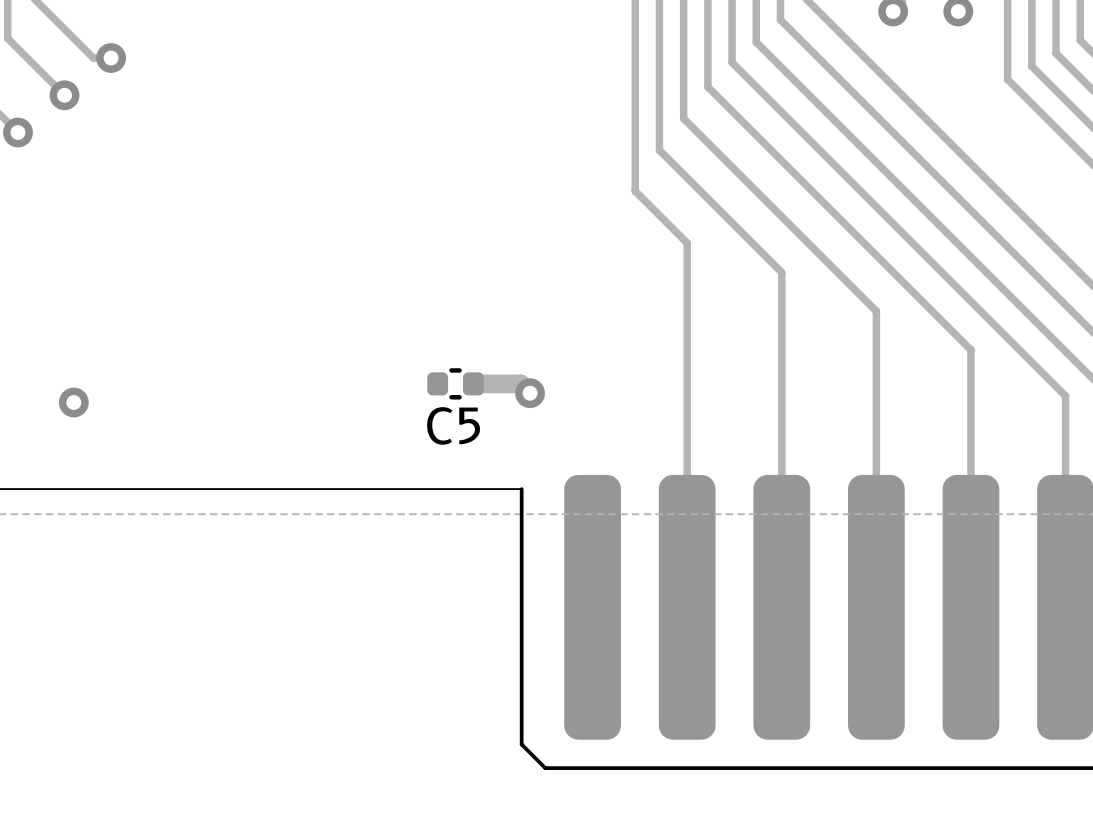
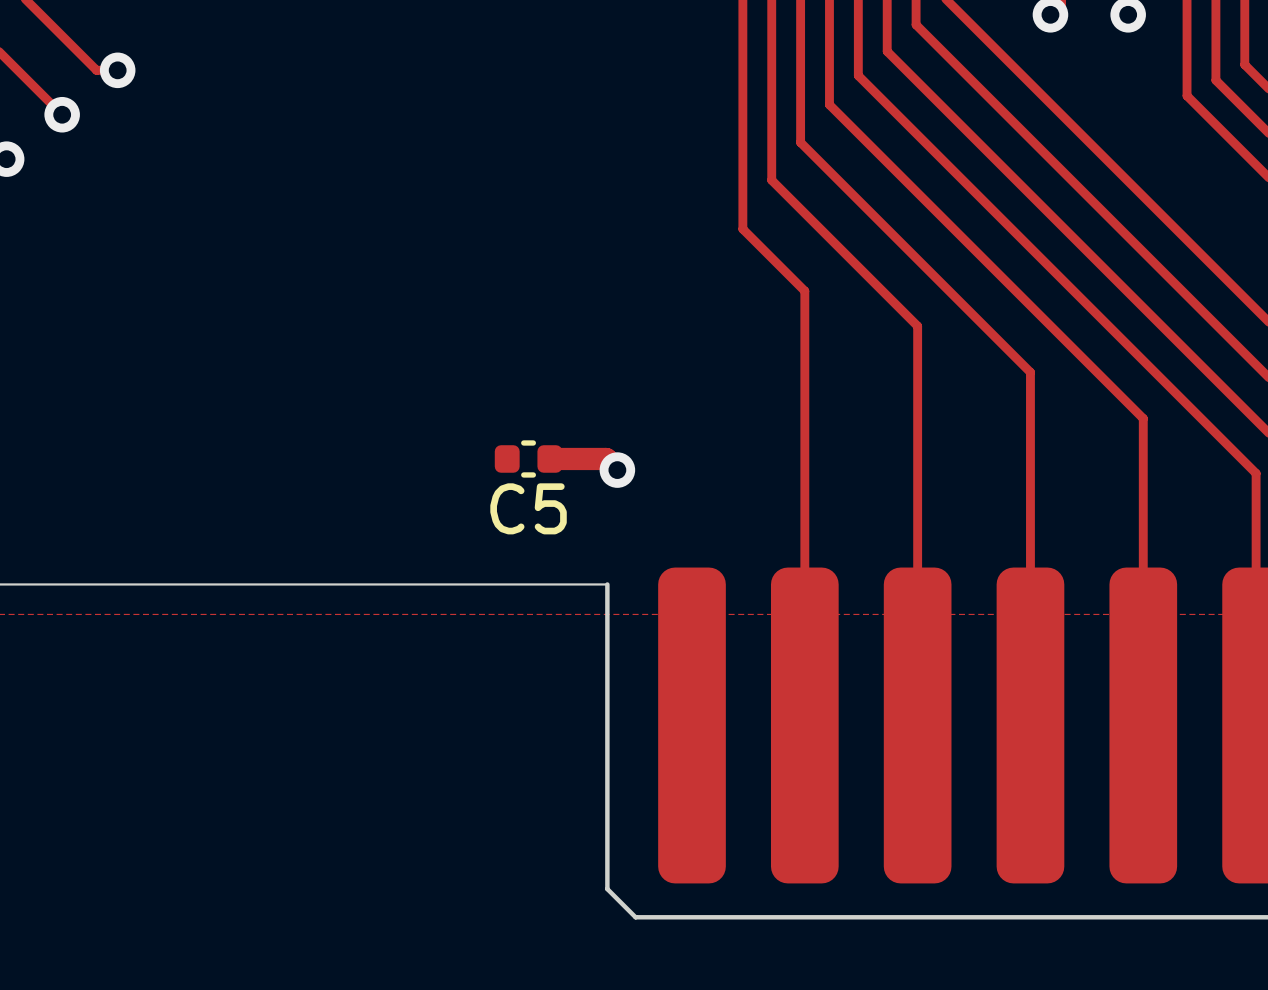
via: (73, 402) -> none

